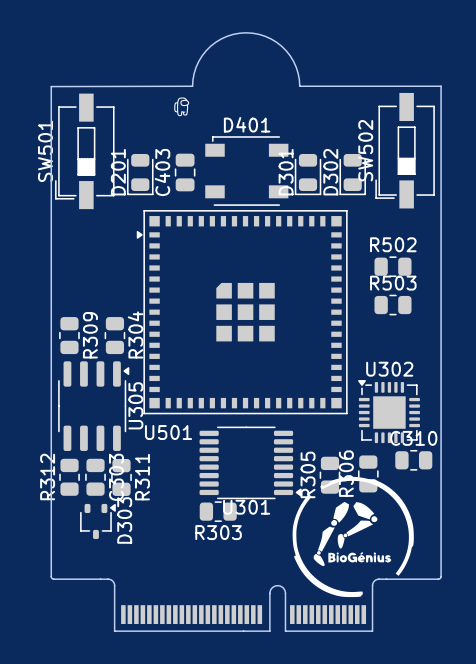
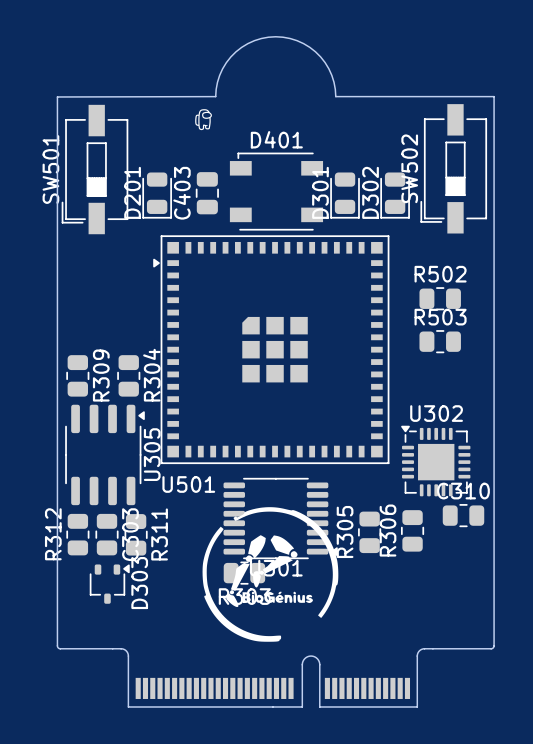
drawing: none -> [259, 570, 265, 575]
drawing position: (363, 510) -> (282, 545)
drawing position: (341, 512) -> (257, 546)
drawing position: (374, 519) -> (294, 554)
drawing position: (334, 522) -> (249, 558)
drawing: none -> [229, 590, 235, 595]
drawing position: (367, 526) -> (285, 562)
drawing: none -> [251, 591, 255, 595]
drawing: none -> [293, 591, 296, 595]
drawing position: (359, 528) -> (277, 564)
drawing: [343, 533, 348, 538] -> none
drawing position: (326, 539) -> (240, 576)
drawing position: (341, 541) -> (256, 579)
drawing position: (327, 545) -> (241, 584)
drawing: [316, 551, 321, 555] -> none
drawing: [336, 552, 339, 555] -> none
drawing: [373, 552, 376, 555] -> none
drawing position: (361, 553) -> (280, 593)
drawing position: (332, 557) -> (246, 597)
drawing position: (352, 557) -> (269, 597)
drawing position: (337, 558) -> (252, 598)
drawing position: (343, 558) -> (259, 598)
drawing position: (361, 558) -> (279, 598)
drawing position: (369, 558) -> (288, 598)
drawing position: (374, 558) -> (294, 598)
drawing position: (380, 558) -> (301, 598)
drawing position: (387, 558) -> (309, 598)
drawing position: (319, 559) -> (232, 600)

